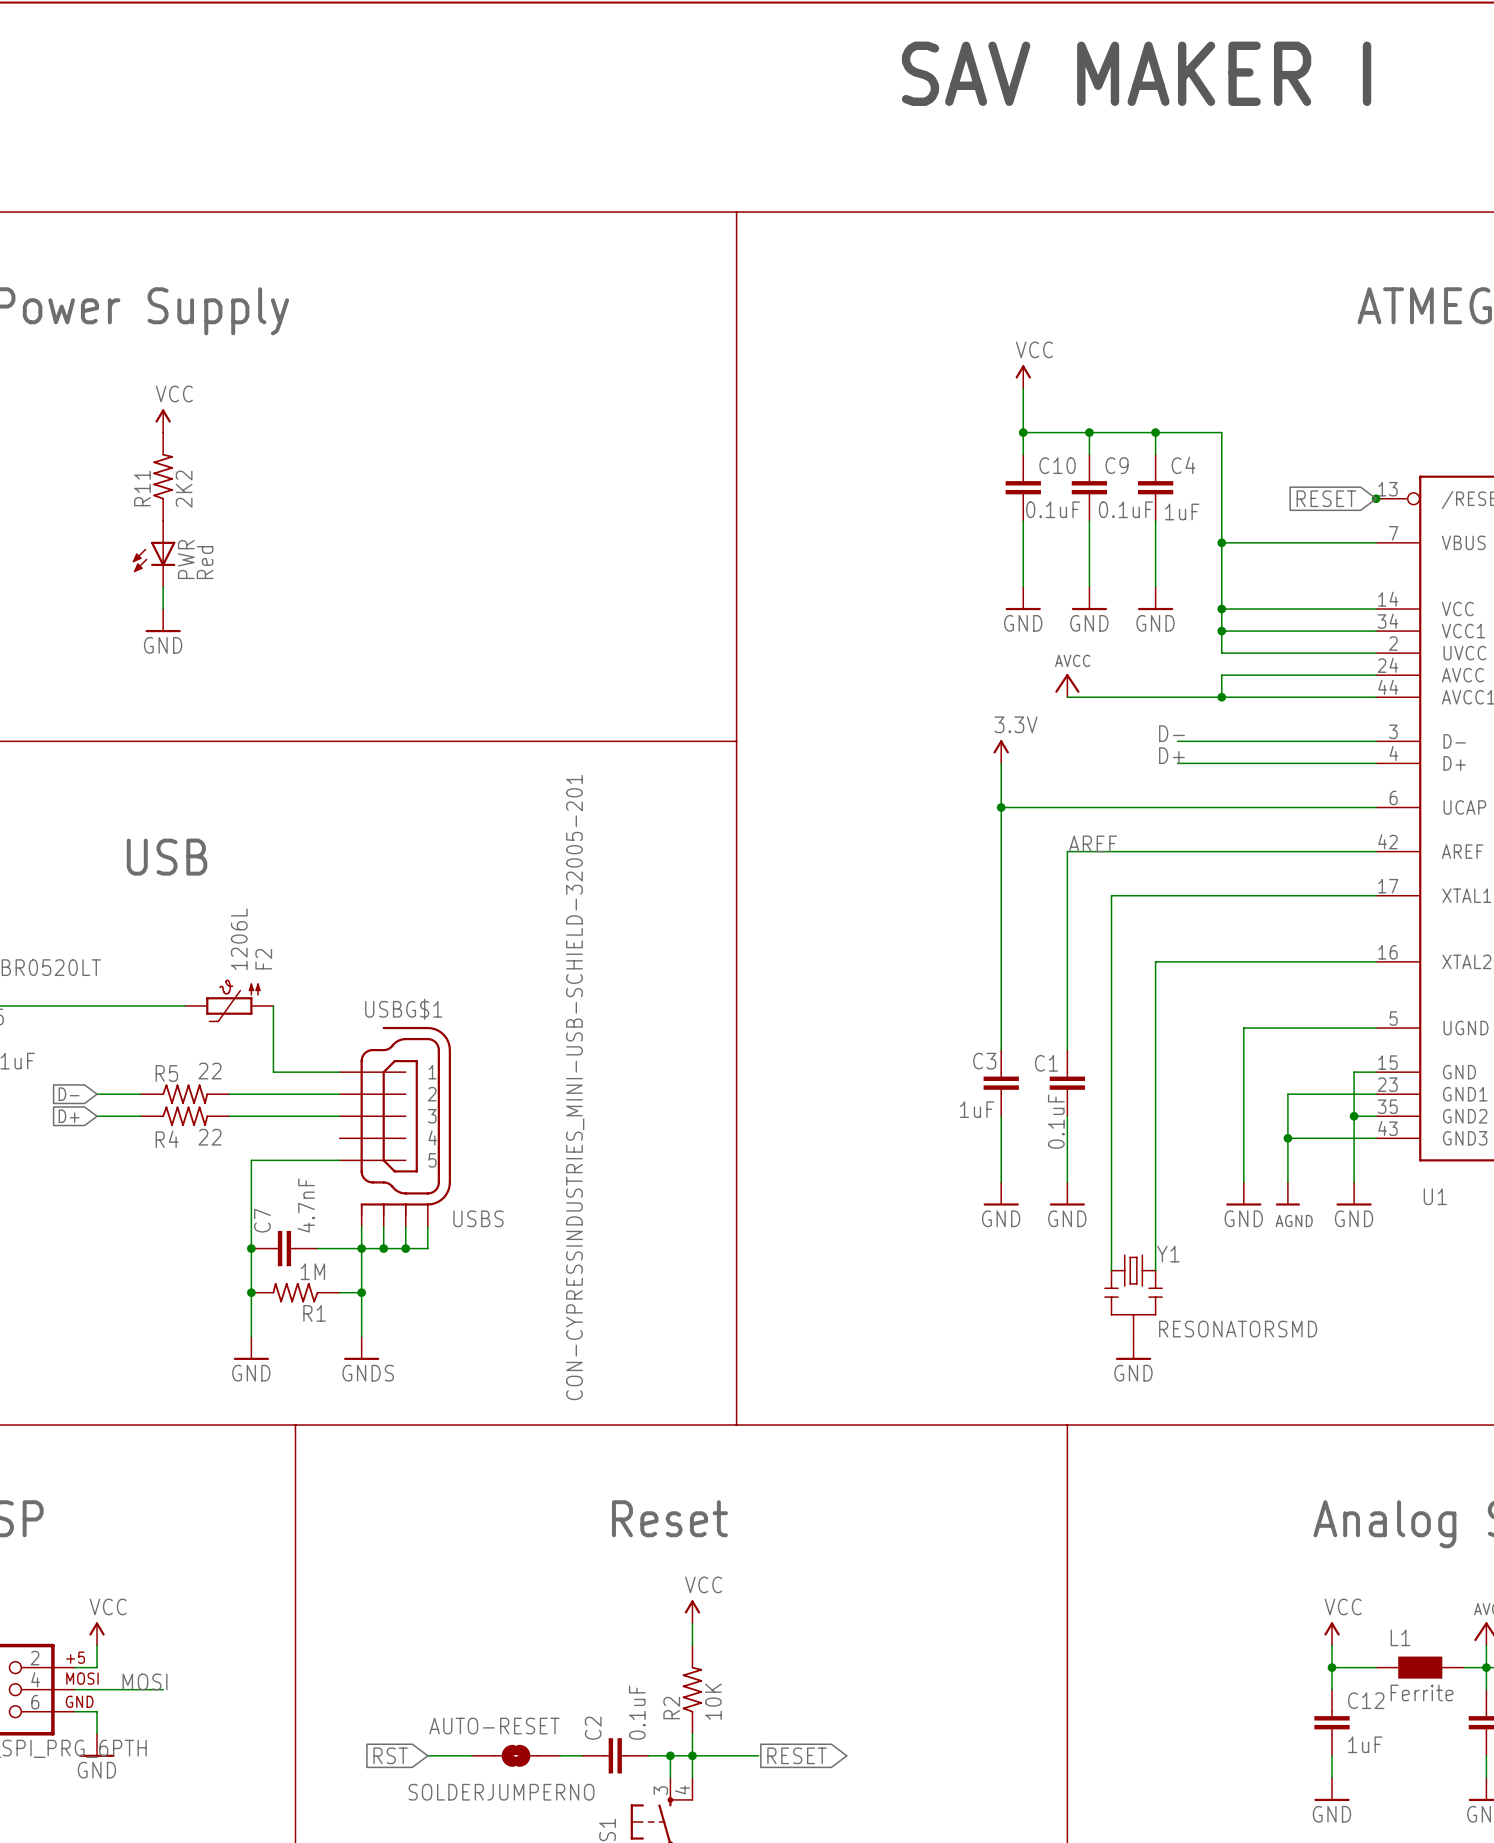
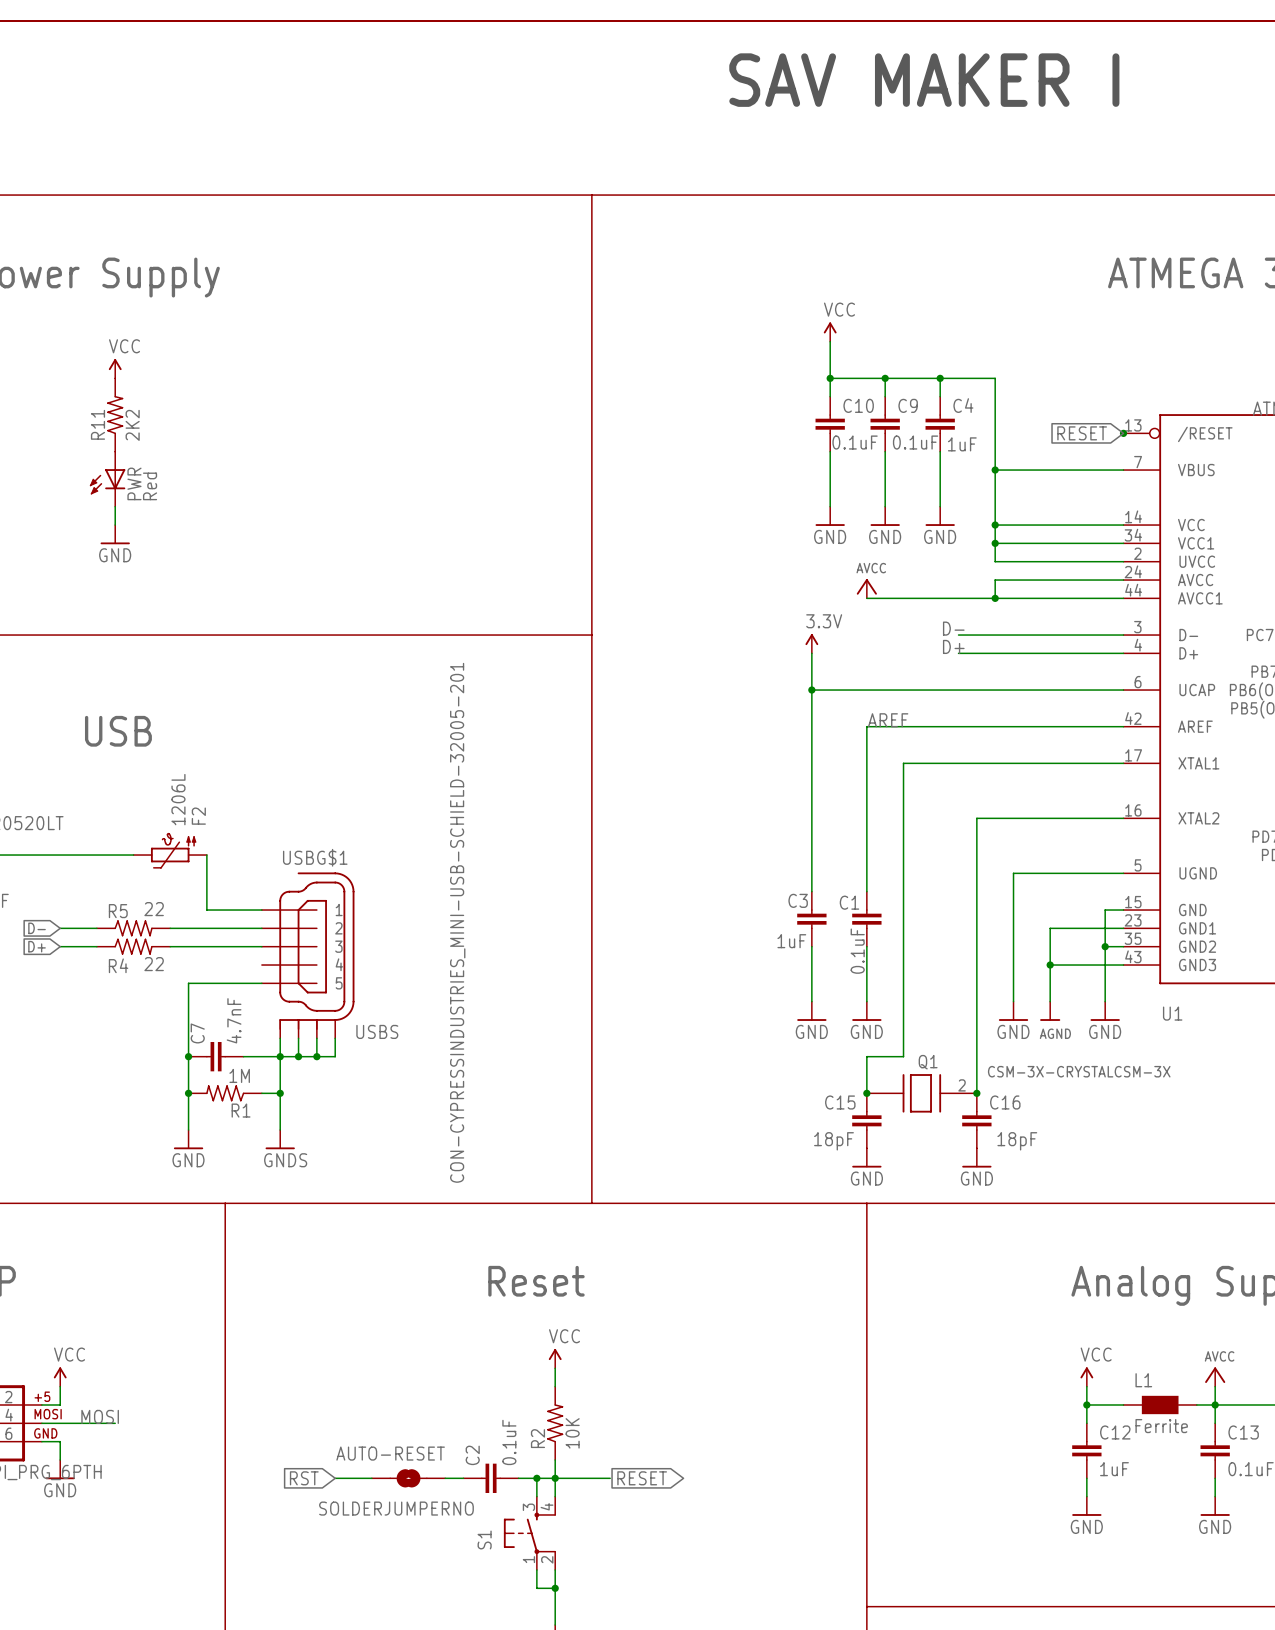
wire: (1199, 961) (1155, 961) (1155, 1270) -> (976, 818) (976, 1093)
wire: (1111, 1248) (1111, 1270) -> (903, 1056) (866, 1056) (866, 1093)
junction: none -> (866, 1093)
Q1: none -> CSM-3X-CRYSTALCSM-3X (921, 1093)
junction: none -> (976, 1093)
Y1: RESONATORSMD (1133, 1296) -> none
C15: none -> 18pF (866, 1120)
C16: none -> 18pF (976, 1120)
power symbol: GND (1133, 1348) -> none
power symbol: none -> GND (866, 1157)
power symbol: none -> GND (976, 1157)

